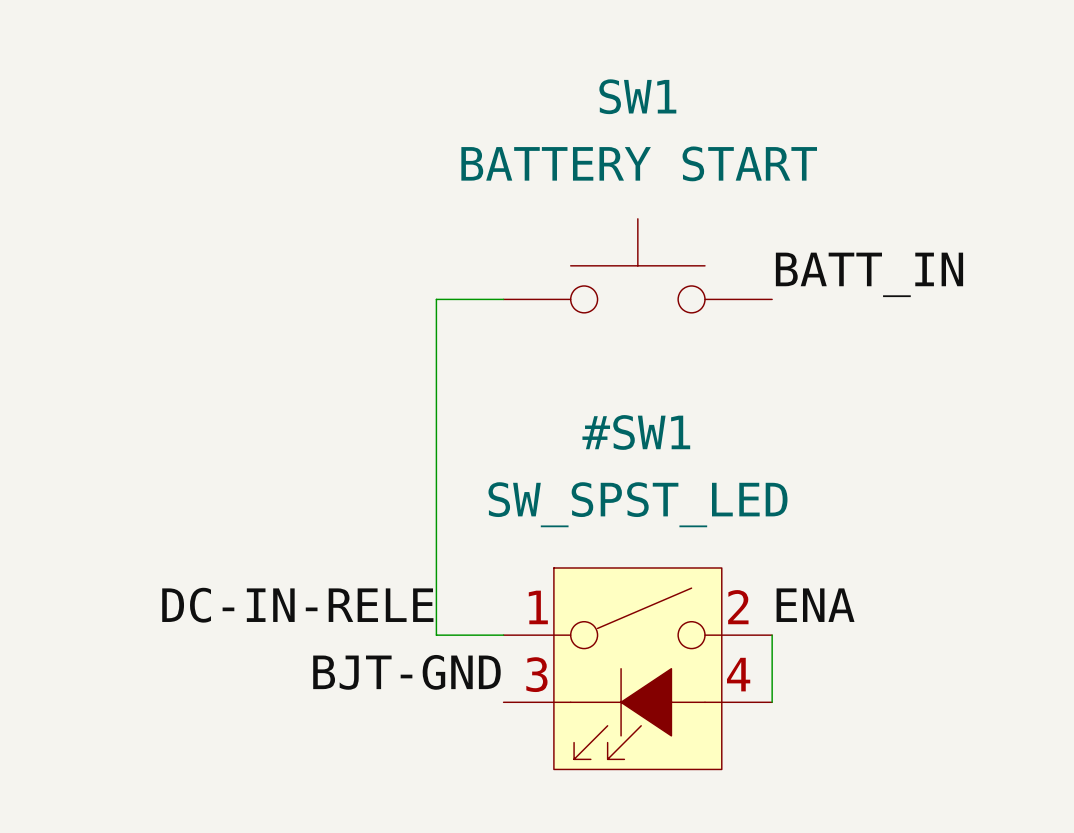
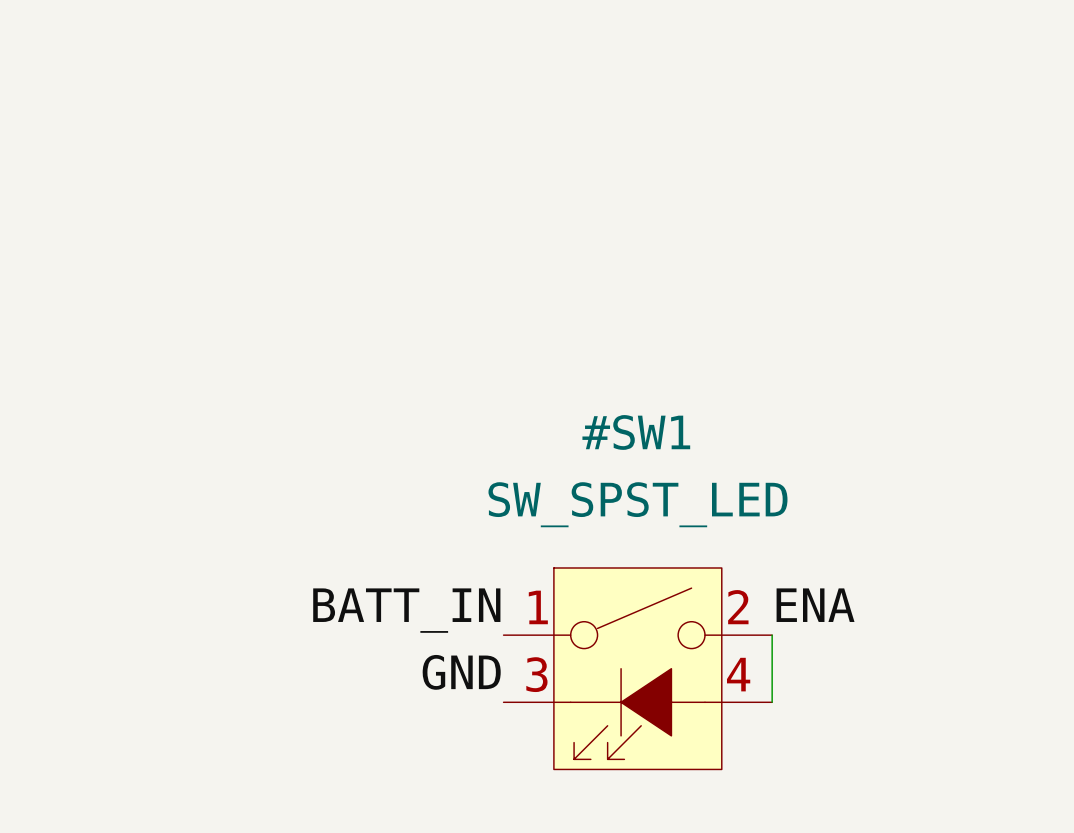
SW1: BATTERY START (637, 265) -> none
label position: BATT_IN (869, 274) -> BATT_IN (406, 610)
wire: (503, 299) (436, 299) (436, 635) (503, 635) -> none
label: DC-IN-RELE (297, 605) -> none
label: BJT-GND (406, 672) -> GND (461, 672)

